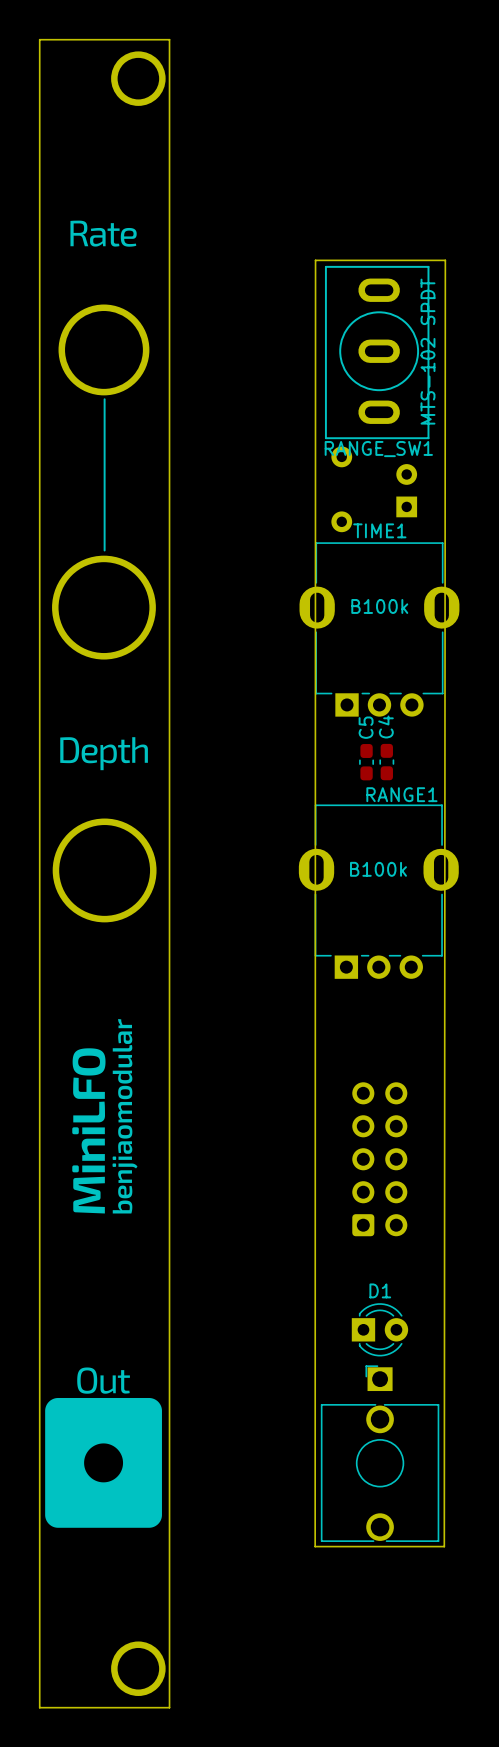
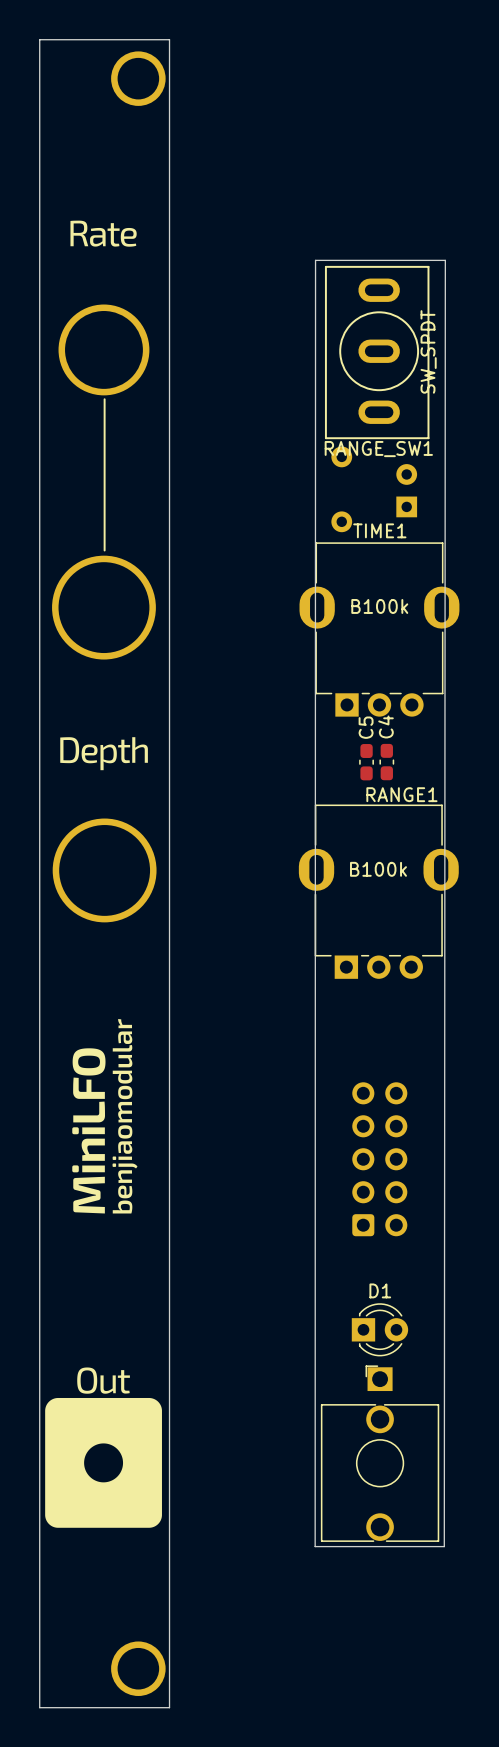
RANGE_SW1 value: MTS-102 SPDT (427, 351) -> SW_SPDT (428, 351)

